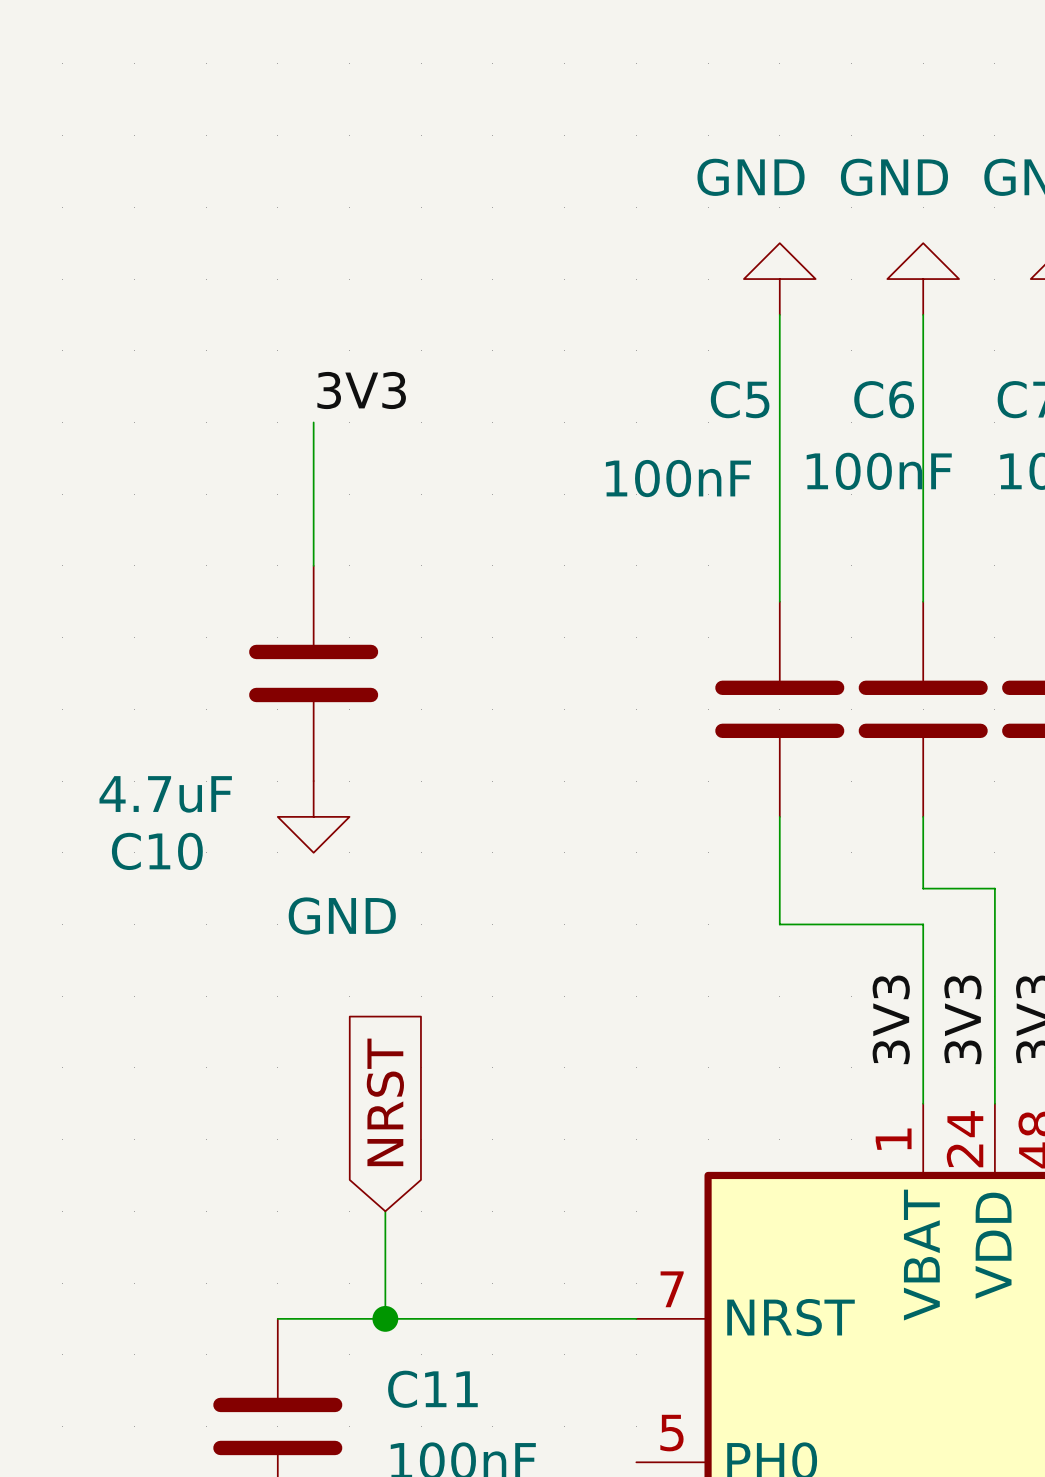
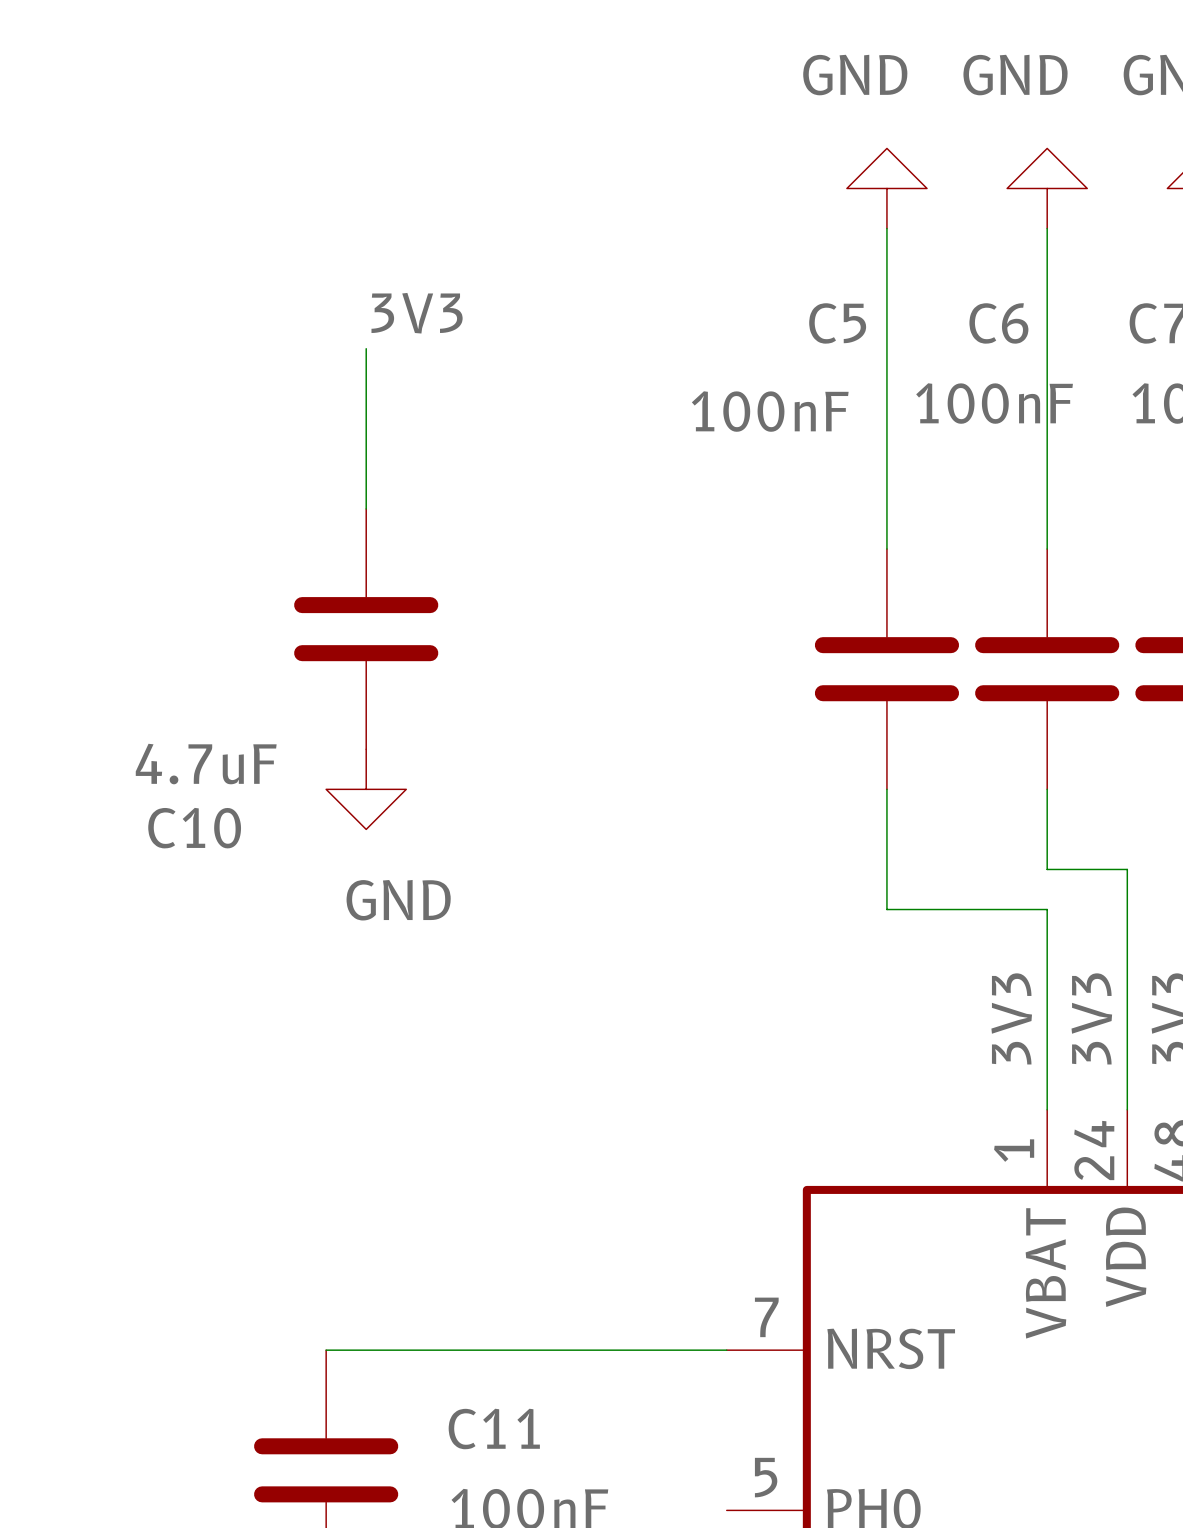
global label: NRST (385, 1102) -> none
wire: (385, 1211) (385, 1318) -> none
junction: (385, 1318) -> none

